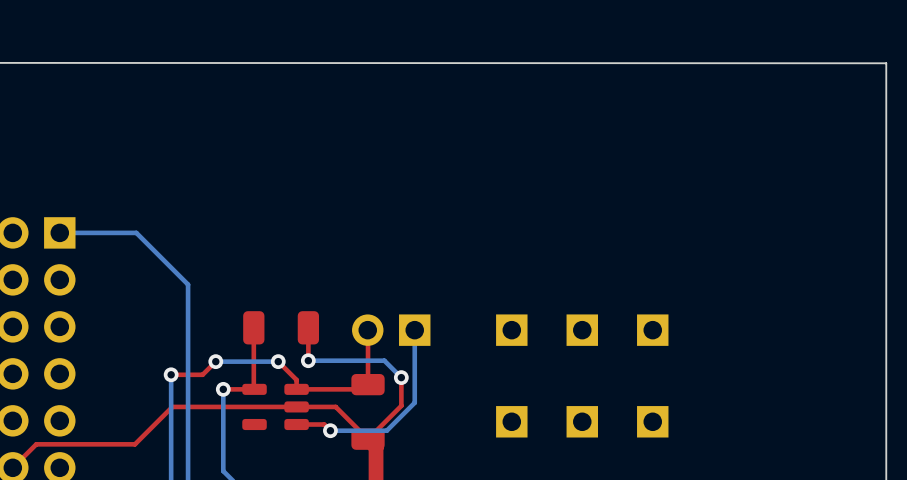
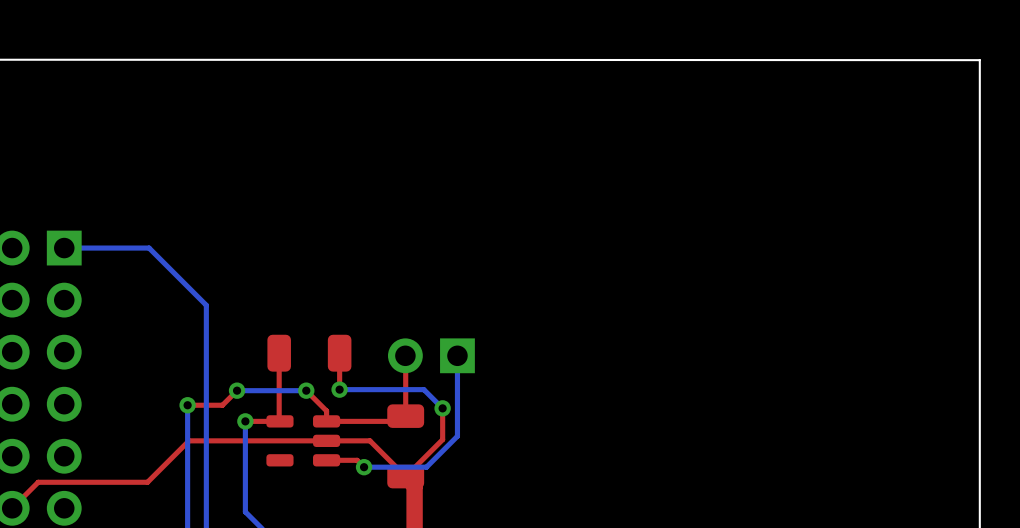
part: (511, 330) -> none
part: (582, 330) -> none
part: (652, 330) -> none
part: (511, 421) -> none
part: (582, 421) -> none
part: (652, 421) -> none

